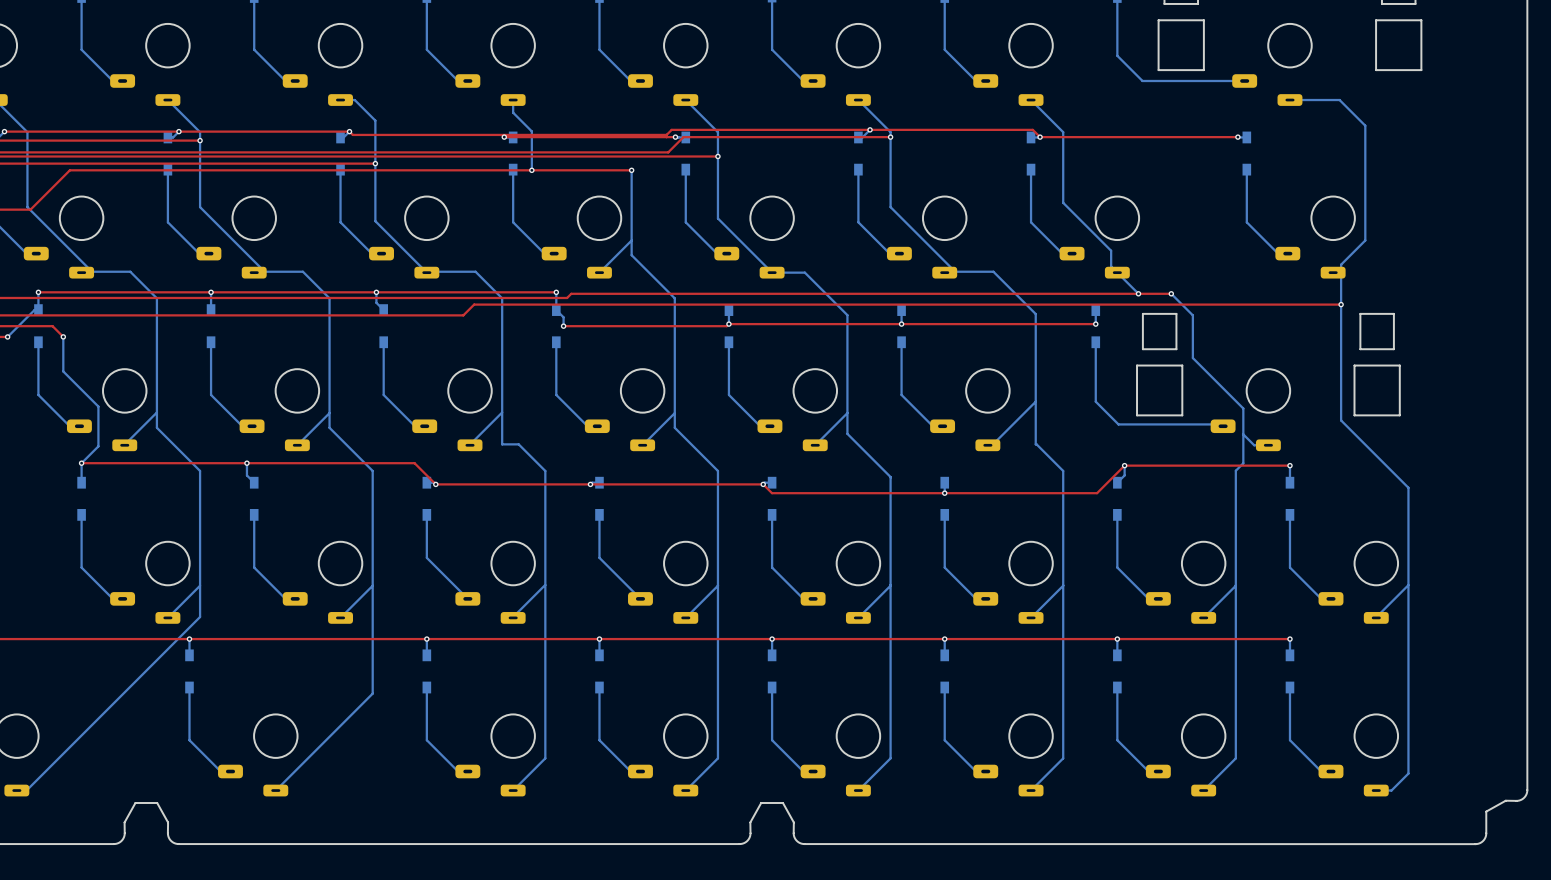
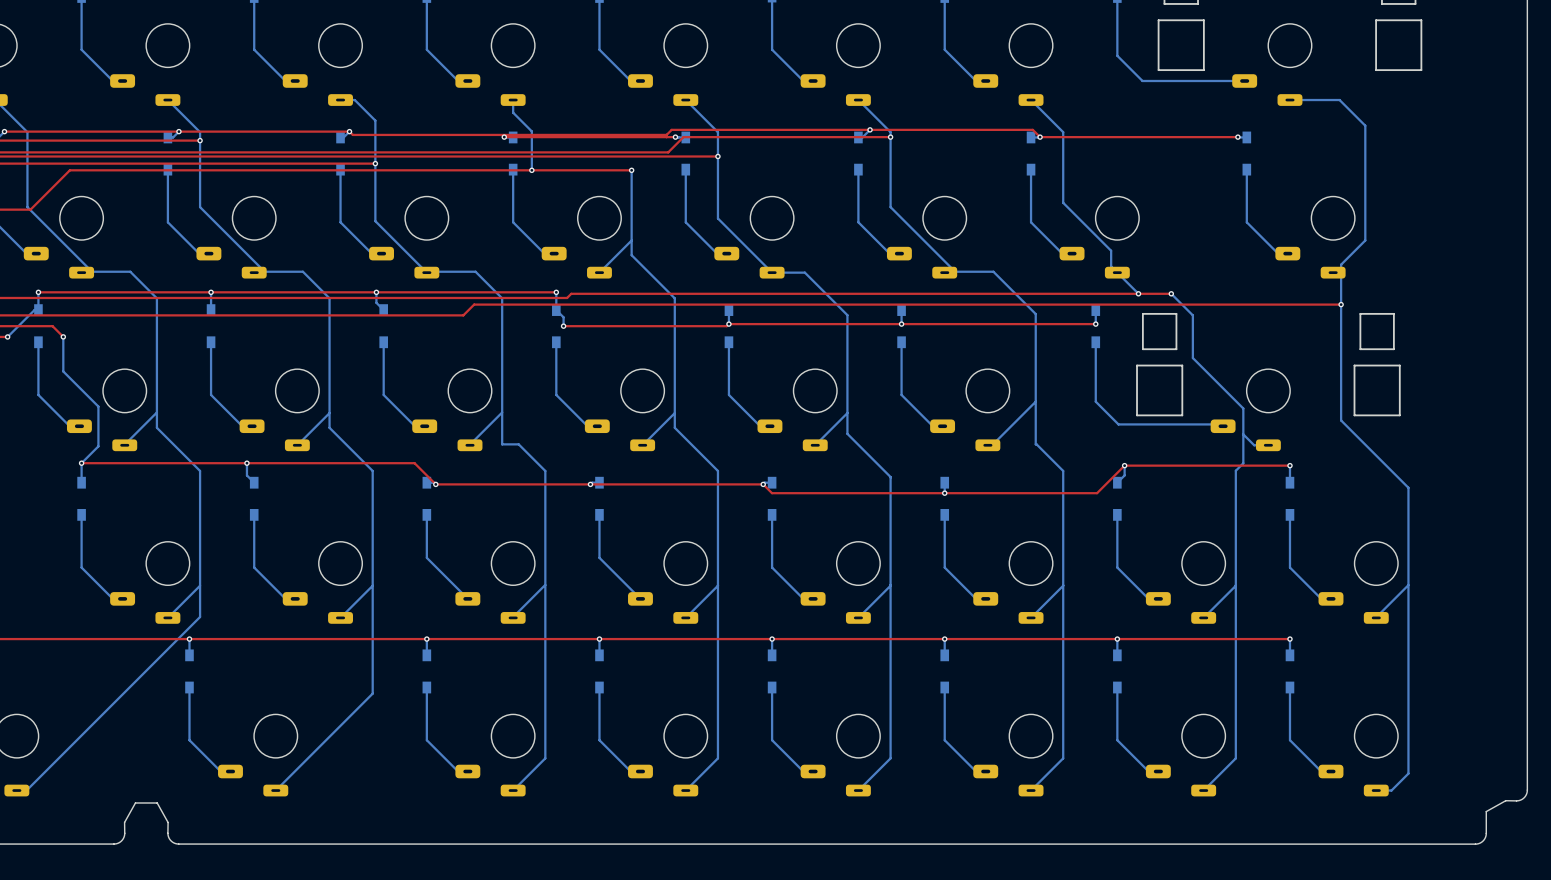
board edge: (178, 844) (741, 843) (749, 837) (750, 822) (761, 802) (782, 802) (793, 822) (794, 837) (803, 843) (1475, 844) -> (178, 844) (1475, 844)

